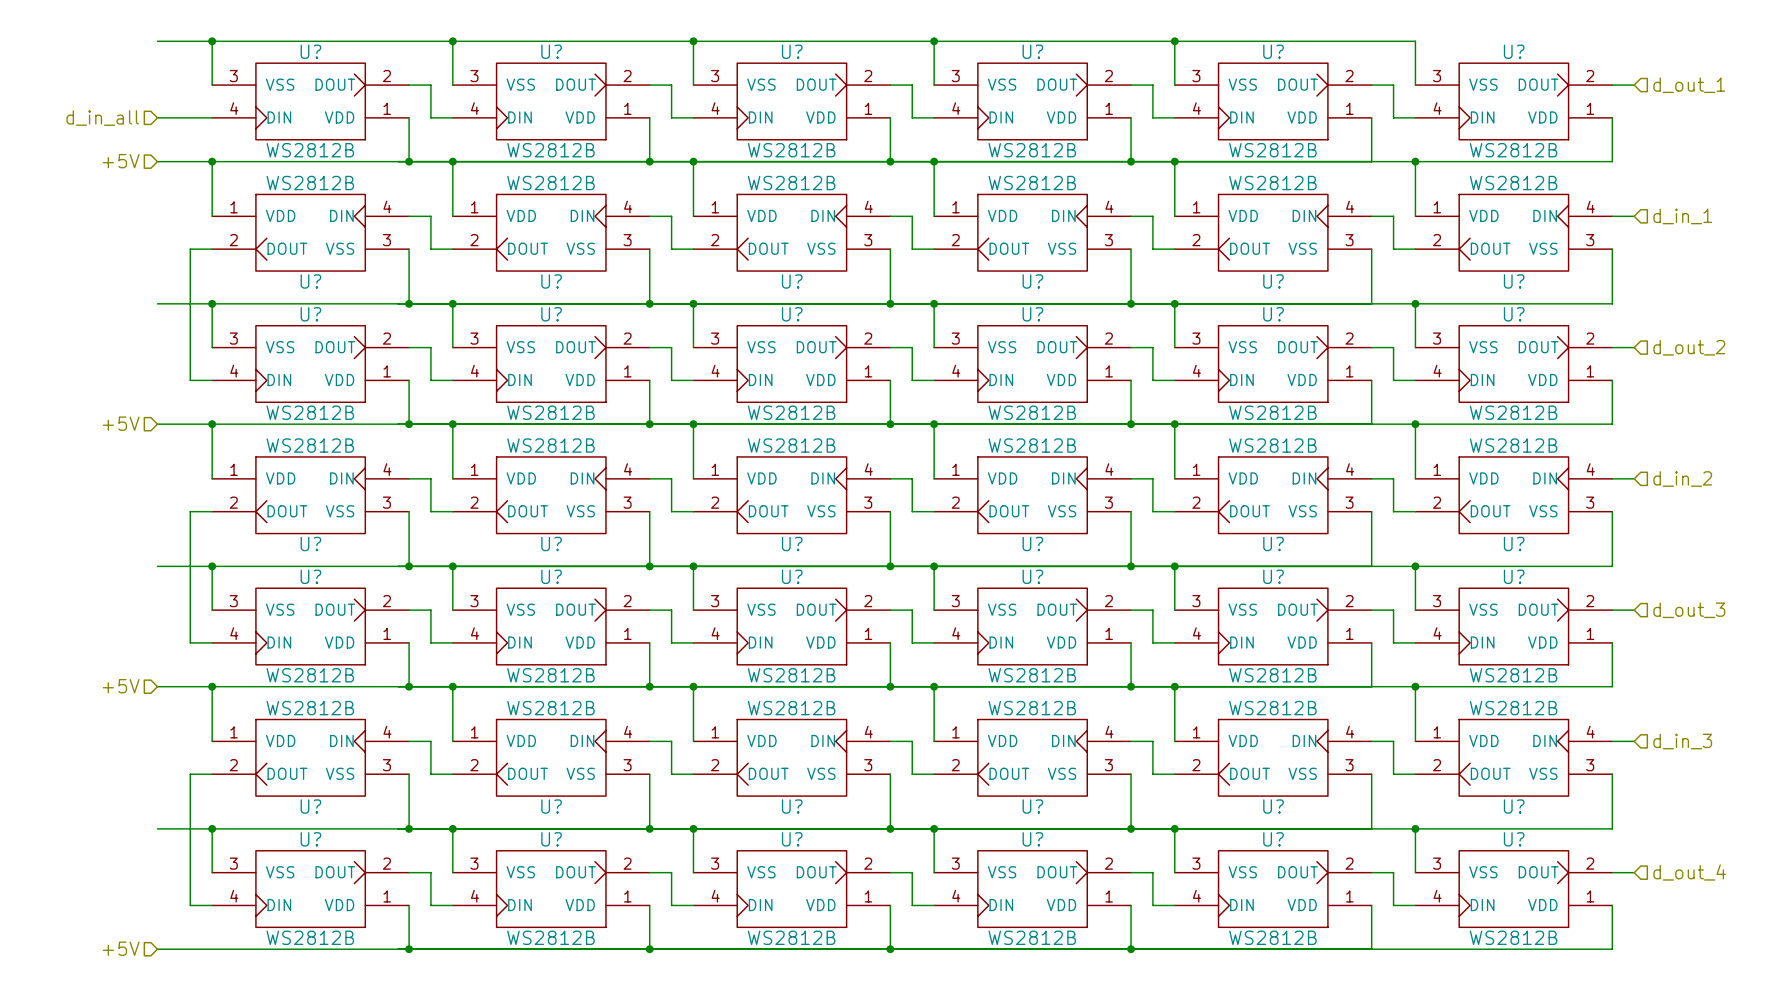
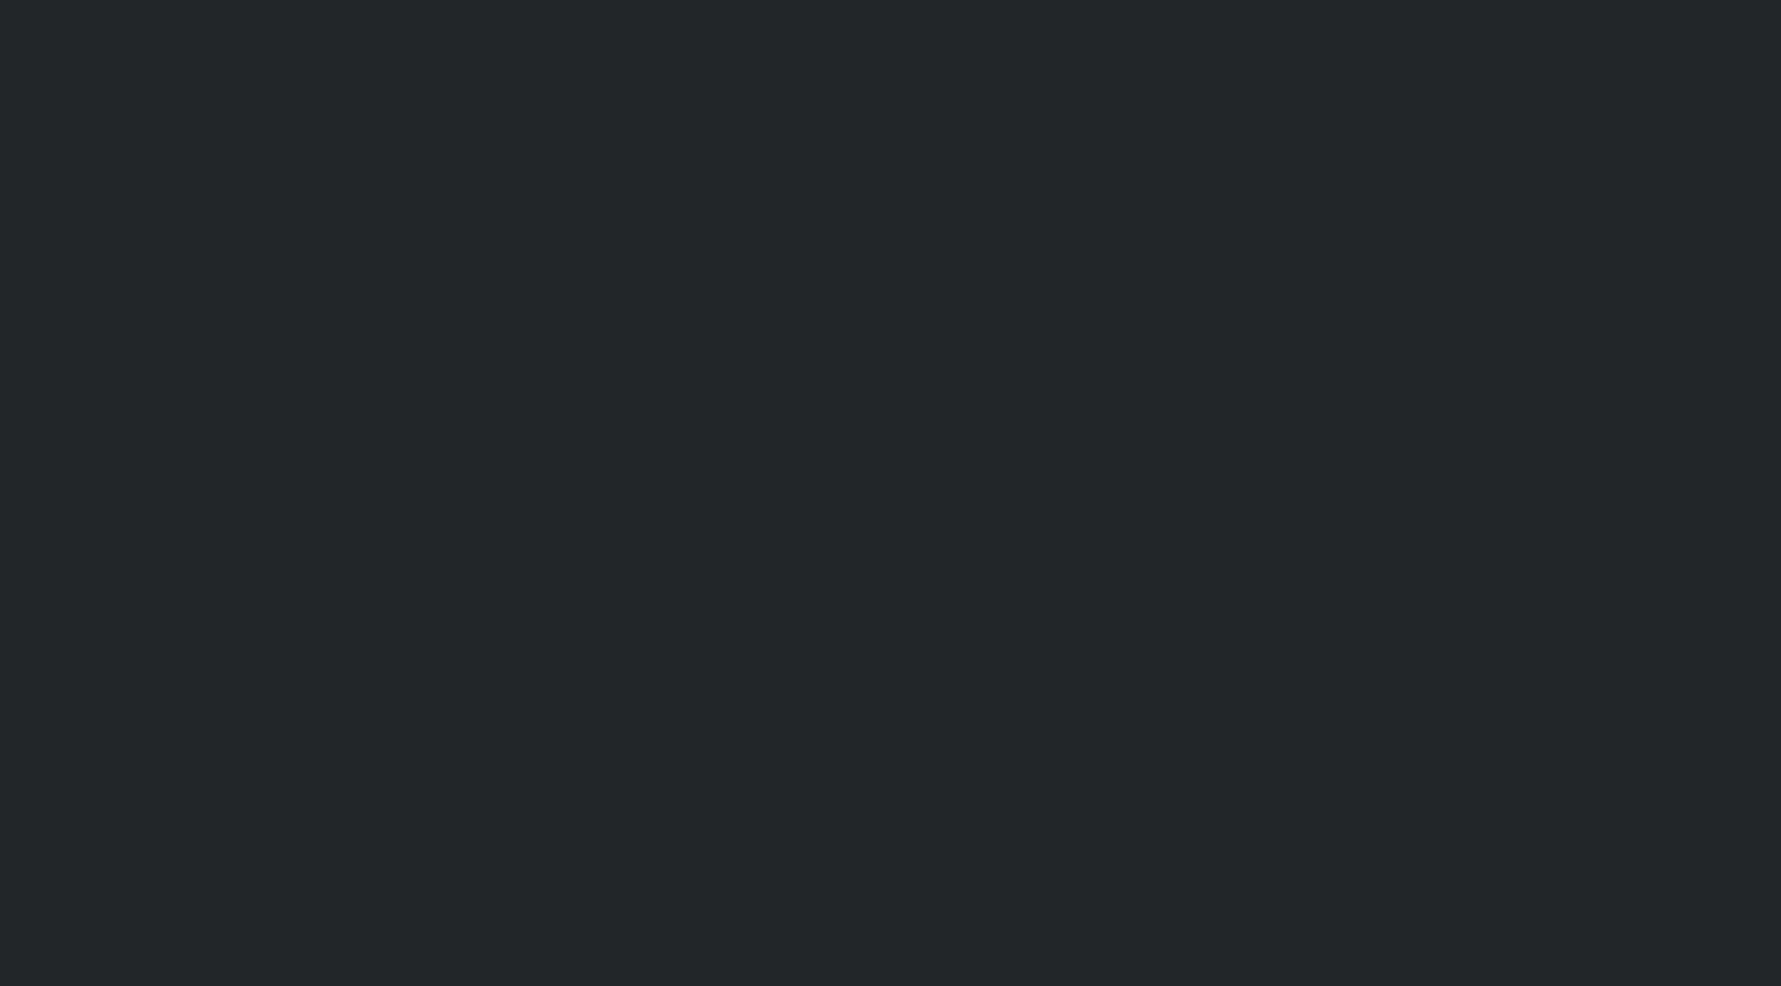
wire: (157, 41) (1415, 41) (1415, 85) -> none
wire: (212, 41) (212, 85) -> none
junction: (212, 41) -> none
wire: (452, 41) (452, 85) -> none
junction: (452, 41) -> none
wire: (693, 41) (693, 85) -> none
junction: (693, 41) -> none
wire: (934, 41) (934, 85) -> none
junction: (934, 41) -> none
wire: (1174, 41) (1174, 85) -> none
junction: (1174, 41) -> none
wire: (409, 85) (430, 85) (430, 117) (452, 117) -> none
wire: (649, 85) (671, 85) (671, 117) (693, 117) -> none
wire: (890, 85) (912, 85) (912, 117) (934, 117) -> none
wire: (1131, 85) (1152, 85) (1152, 117) (1174, 117) -> none
wire: (1371, 85) (1393, 85) (1393, 117) (1415, 117) -> none
wire: (1612, 85) (1634, 85) -> none
hierarchical label: d_out_1 (1689, 85) -> none
U?: WS2812B (310, 101) -> none
U?: WS2812B (551, 101) -> none
U?: WS2812B (791, 101) -> none
U?: WS2812B (1032, 101) -> none
U?: WS2812B (1273, 101) -> none
U?: WS2812B (1513, 101) -> none
wire: (157, 117) (212, 117) -> none
wire: (409, 117) (409, 161) -> none
wire: (649, 117) (649, 161) -> none
wire: (890, 117) (890, 161) -> none
wire: (1131, 117) (1131, 161) -> none
wire: (1371, 117) (1371, 161) -> none
wire: (1612, 117) (1612, 161) (157, 161) -> none
hierarchical label: d_in_all (102, 118) -> none
hierarchical label: +5V (121, 161) -> none
wire: (212, 161) (212, 216) -> none
junction: (212, 161) -> none
junction: (409, 161) -> none
wire: (452, 161) (452, 216) -> none
junction: (452, 161) -> none
junction: (649, 161) -> none
wire: (693, 161) (693, 216) -> none
junction: (693, 161) -> none
junction: (890, 161) -> none
wire: (934, 161) (934, 216) -> none
junction: (934, 161) -> none
junction: (1131, 161) -> none
wire: (1174, 161) (1174, 216) -> none
junction: (1174, 161) -> none
wire: (1415, 161) (1415, 216) -> none
junction: (1415, 161) -> none
wire: (409, 216) (430, 216) (430, 249) (452, 249) -> none
wire: (649, 216) (671, 216) (671, 249) (693, 249) -> none
wire: (890, 216) (912, 216) (912, 249) (934, 249) -> none
wire: (1131, 216) (1152, 216) (1152, 249) (1174, 249) -> none
wire: (1371, 216) (1393, 216) (1393, 249) (1415, 249) -> none
wire: (1612, 216) (1634, 216) -> none
hierarchical label: d_in_1 (1682, 216) -> none
U?: WS2812B (310, 232) -> none
U?: WS2812B (551, 232) -> none
U?: WS2812B (791, 232) -> none
U?: WS2812B (1032, 232) -> none
U?: WS2812B (1273, 232) -> none
U?: WS2812B (1513, 232) -> none
wire: (212, 249) (190, 249) (190, 380) (212, 380) -> none
wire: (409, 249) (409, 303) -> none
wire: (649, 249) (649, 303) -> none
wire: (890, 249) (890, 303) -> none
wire: (1131, 249) (1131, 303) -> none
wire: (1371, 249) (1371, 303) -> none
wire: (1612, 249) (1612, 303) (157, 303) -> none
wire: (212, 303) (212, 347) -> none
junction: (212, 303) -> none
junction: (409, 303) -> none
wire: (452, 303) (452, 347) -> none
junction: (452, 303) -> none
junction: (649, 303) -> none
wire: (693, 303) (693, 347) -> none
junction: (693, 303) -> none
junction: (890, 303) -> none
wire: (934, 303) (934, 347) -> none
junction: (934, 303) -> none
junction: (1131, 303) -> none
wire: (1174, 303) (1174, 347) -> none
junction: (1174, 303) -> none
wire: (1415, 303) (1415, 347) -> none
junction: (1415, 303) -> none
wire: (409, 347) (430, 347) (430, 380) (452, 380) -> none
wire: (649, 347) (671, 347) (671, 380) (693, 380) -> none
wire: (890, 347) (912, 347) (912, 380) (934, 380) -> none
wire: (1131, 347) (1152, 347) (1152, 380) (1174, 380) -> none
wire: (1371, 347) (1393, 347) (1393, 380) (1415, 380) -> none
wire: (1612, 347) (1634, 347) -> none
hierarchical label: d_out_2 (1689, 347) -> none
U?: WS2812B (310, 364) -> none
U?: WS2812B (551, 364) -> none
U?: WS2812B (791, 364) -> none
U?: WS2812B (1032, 364) -> none
U?: WS2812B (1273, 364) -> none
U?: WS2812B (1513, 364) -> none
wire: (409, 380) (409, 424) -> none
wire: (649, 380) (649, 424) -> none
wire: (890, 380) (890, 424) -> none
wire: (1131, 380) (1131, 424) -> none
wire: (1371, 380) (1371, 424) -> none
wire: (1612, 380) (1612, 424) (157, 424) -> none
hierarchical label: +5V (121, 423) -> none
wire: (212, 424) (212, 478) -> none
junction: (212, 424) -> none
junction: (409, 424) -> none
wire: (452, 424) (452, 478) -> none
junction: (452, 424) -> none
junction: (649, 424) -> none
wire: (693, 424) (693, 478) -> none
junction: (693, 424) -> none
junction: (890, 424) -> none
wire: (934, 424) (934, 478) -> none
junction: (934, 424) -> none
junction: (1131, 424) -> none
wire: (1174, 424) (1174, 478) -> none
junction: (1174, 424) -> none
wire: (1415, 424) (1415, 478) -> none
junction: (1415, 424) -> none
wire: (409, 478) (430, 478) (430, 511) (452, 511) -> none
wire: (649, 478) (671, 478) (671, 511) (693, 511) -> none
wire: (890, 478) (912, 478) (912, 511) (934, 511) -> none
wire: (1131, 478) (1152, 478) (1152, 511) (1174, 511) -> none
wire: (1371, 478) (1393, 478) (1393, 511) (1415, 511) -> none
wire: (1612, 478) (1634, 478) -> none
hierarchical label: d_in_2 (1682, 478) -> none
U?: WS2812B (310, 495) -> none
U?: WS2812B (551, 495) -> none
U?: WS2812B (791, 495) -> none
U?: WS2812B (1032, 495) -> none
U?: WS2812B (1273, 495) -> none
U?: WS2812B (1513, 495) -> none
wire: (212, 511) (190, 511) (190, 642) (212, 642) -> none
wire: (409, 511) (409, 566) -> none
wire: (649, 511) (649, 566) -> none
wire: (890, 511) (890, 566) -> none
wire: (1131, 511) (1131, 566) -> none
wire: (1371, 511) (1371, 566) -> none
wire: (1612, 511) (1612, 566) (157, 566) -> none
wire: (212, 566) (212, 610) -> none
junction: (212, 566) -> none
junction: (409, 566) -> none
wire: (452, 566) (452, 610) -> none
junction: (452, 566) -> none
junction: (649, 566) -> none
wire: (693, 566) (693, 610) -> none
junction: (693, 566) -> none
junction: (890, 566) -> none
wire: (934, 566) (934, 610) -> none
junction: (934, 566) -> none
junction: (1131, 566) -> none
wire: (1174, 566) (1174, 610) -> none
junction: (1174, 566) -> none
wire: (1415, 566) (1415, 610) -> none
junction: (1415, 566) -> none
wire: (409, 610) (430, 610) (430, 642) (452, 642) -> none
wire: (649, 610) (671, 610) (671, 642) (693, 642) -> none
wire: (890, 610) (912, 610) (912, 642) (934, 642) -> none
wire: (1131, 610) (1152, 610) (1152, 642) (1174, 642) -> none
wire: (1371, 610) (1393, 610) (1393, 642) (1415, 642) -> none
wire: (1612, 610) (1634, 610) -> none
hierarchical label: d_out_3 (1689, 610) -> none
U?: WS2812B (310, 626) -> none
U?: WS2812B (551, 626) -> none
U?: WS2812B (791, 626) -> none
U?: WS2812B (1032, 626) -> none
U?: WS2812B (1273, 626) -> none
U?: WS2812B (1513, 626) -> none
wire: (409, 642) (409, 686) -> none
wire: (649, 642) (649, 686) -> none
wire: (890, 642) (890, 686) -> none
wire: (1131, 642) (1131, 686) -> none
wire: (1371, 642) (1371, 686) -> none
wire: (1612, 642) (1612, 686) (157, 686) -> none
hierarchical label: +5V (121, 686) -> none
wire: (212, 686) (212, 741) -> none
junction: (212, 686) -> none
junction: (409, 686) -> none
wire: (452, 686) (452, 741) -> none
junction: (452, 686) -> none
junction: (649, 686) -> none
wire: (693, 686) (693, 741) -> none
junction: (693, 686) -> none
junction: (890, 686) -> none
wire: (934, 686) (934, 741) -> none
junction: (934, 686) -> none
junction: (1131, 686) -> none
wire: (1174, 686) (1174, 741) -> none
junction: (1174, 686) -> none
wire: (1415, 686) (1415, 741) -> none
junction: (1415, 686) -> none
wire: (409, 741) (430, 741) (430, 774) (452, 774) -> none
wire: (649, 741) (671, 741) (671, 774) (693, 774) -> none
wire: (890, 741) (912, 741) (912, 774) (934, 774) -> none
wire: (1131, 741) (1152, 741) (1152, 774) (1174, 774) -> none
wire: (1371, 741) (1393, 741) (1393, 774) (1415, 774) -> none
wire: (1612, 741) (1634, 741) -> none
hierarchical label: d_in_3 (1682, 741) -> none
U?: WS2812B (310, 757) -> none
U?: WS2812B (551, 757) -> none
U?: WS2812B (791, 757) -> none
U?: WS2812B (1032, 757) -> none
U?: WS2812B (1273, 757) -> none
U?: WS2812B (1513, 757) -> none
wire: (212, 774) (190, 774) (190, 905) (212, 905) -> none
wire: (409, 774) (409, 828) -> none
wire: (649, 774) (649, 828) -> none
wire: (890, 774) (890, 828) -> none
wire: (1131, 774) (1131, 828) -> none
wire: (1371, 774) (1371, 828) -> none
wire: (1612, 774) (1612, 828) (157, 828) -> none
wire: (212, 828) (212, 872) -> none
junction: (212, 828) -> none
junction: (409, 828) -> none
wire: (452, 828) (452, 872) -> none
junction: (452, 828) -> none
junction: (649, 828) -> none
wire: (693, 828) (693, 872) -> none
junction: (693, 828) -> none
junction: (890, 828) -> none
wire: (934, 828) (934, 872) -> none
junction: (934, 828) -> none
junction: (1131, 828) -> none
wire: (1174, 828) (1174, 872) -> none
junction: (1174, 828) -> none
wire: (1415, 828) (1415, 872) -> none
junction: (1415, 828) -> none
wire: (409, 872) (430, 872) (430, 905) (452, 905) -> none
wire: (649, 872) (671, 872) (671, 905) (693, 905) -> none
wire: (890, 872) (912, 872) (912, 905) (934, 905) -> none
wire: (1131, 872) (1152, 872) (1152, 905) (1174, 905) -> none
wire: (1371, 872) (1393, 872) (1393, 905) (1415, 905) -> none
wire: (1612, 872) (1634, 872) -> none
hierarchical label: d_out_4 (1689, 872) -> none
U?: WS2812B (310, 889) -> none
U?: WS2812B (551, 889) -> none
U?: WS2812B (791, 889) -> none
U?: WS2812B (1032, 889) -> none
U?: WS2812B (1273, 889) -> none
U?: WS2812B (1513, 889) -> none
wire: (409, 905) (409, 949) -> none
wire: (649, 905) (649, 949) -> none
wire: (890, 905) (890, 949) -> none
wire: (1131, 905) (1131, 949) -> none
wire: (1371, 905) (1371, 949) -> none
wire: (1612, 905) (1612, 949) (157, 949) -> none
hierarchical label: +5V (121, 948) -> none
junction: (409, 949) -> none
junction: (649, 949) -> none
junction: (890, 949) -> none
junction: (1131, 949) -> none

